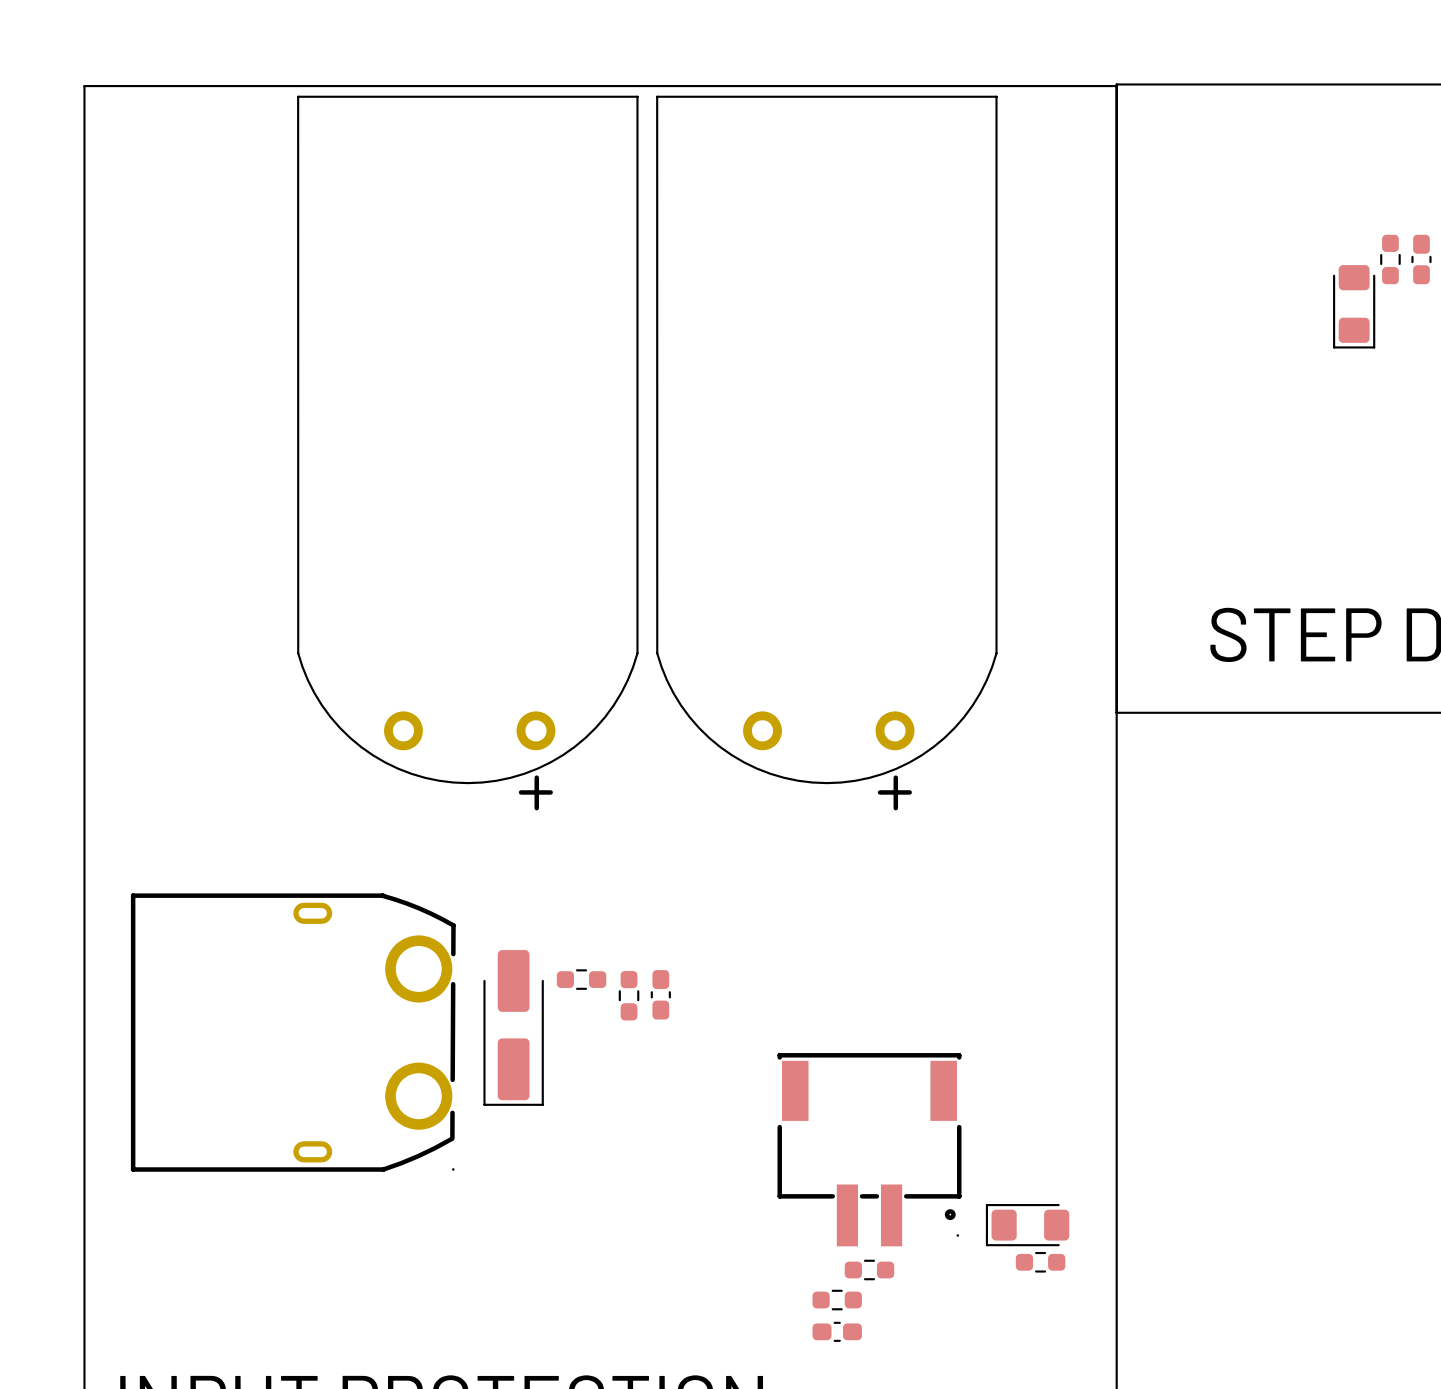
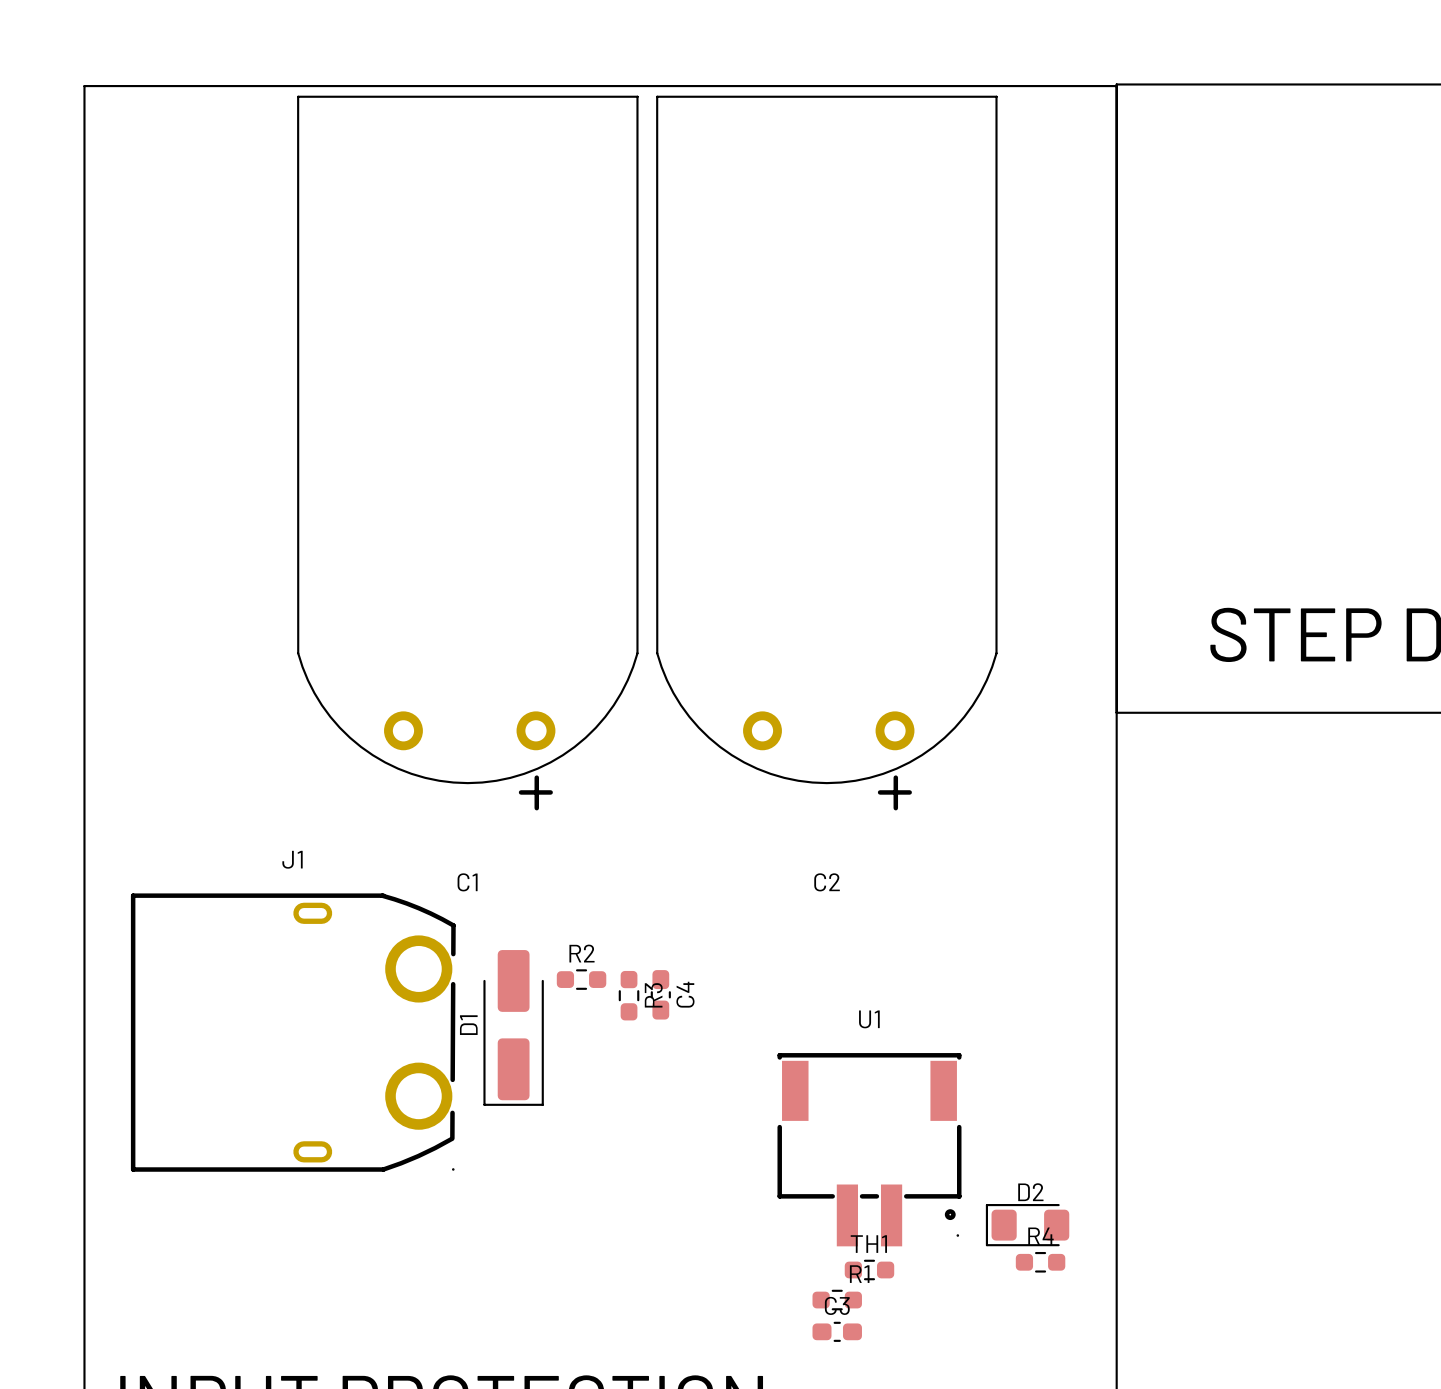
part: (1390, 259) -> none
part: (1421, 259) -> none
part: (1354, 306) -> none
J1 name: none -> J1 (292, 859)
C1 name: none -> C1 (467, 882)
C2 name: none -> C2 (827, 882)
R2 name: none -> R2 (582, 953)
C4 name: none -> C4 (685, 994)
R3 name: none -> R3 (653, 995)
U1 name: none -> U1 (869, 1019)
D1 name: none -> D1 (468, 1025)
D2 name: none -> D2 (1030, 1192)
R4 name: none -> R4 (1040, 1236)
TH1 name: none -> TH1 (868, 1244)
R1 name: none -> R1 (859, 1274)
C3 name: none -> C3 (837, 1305)

